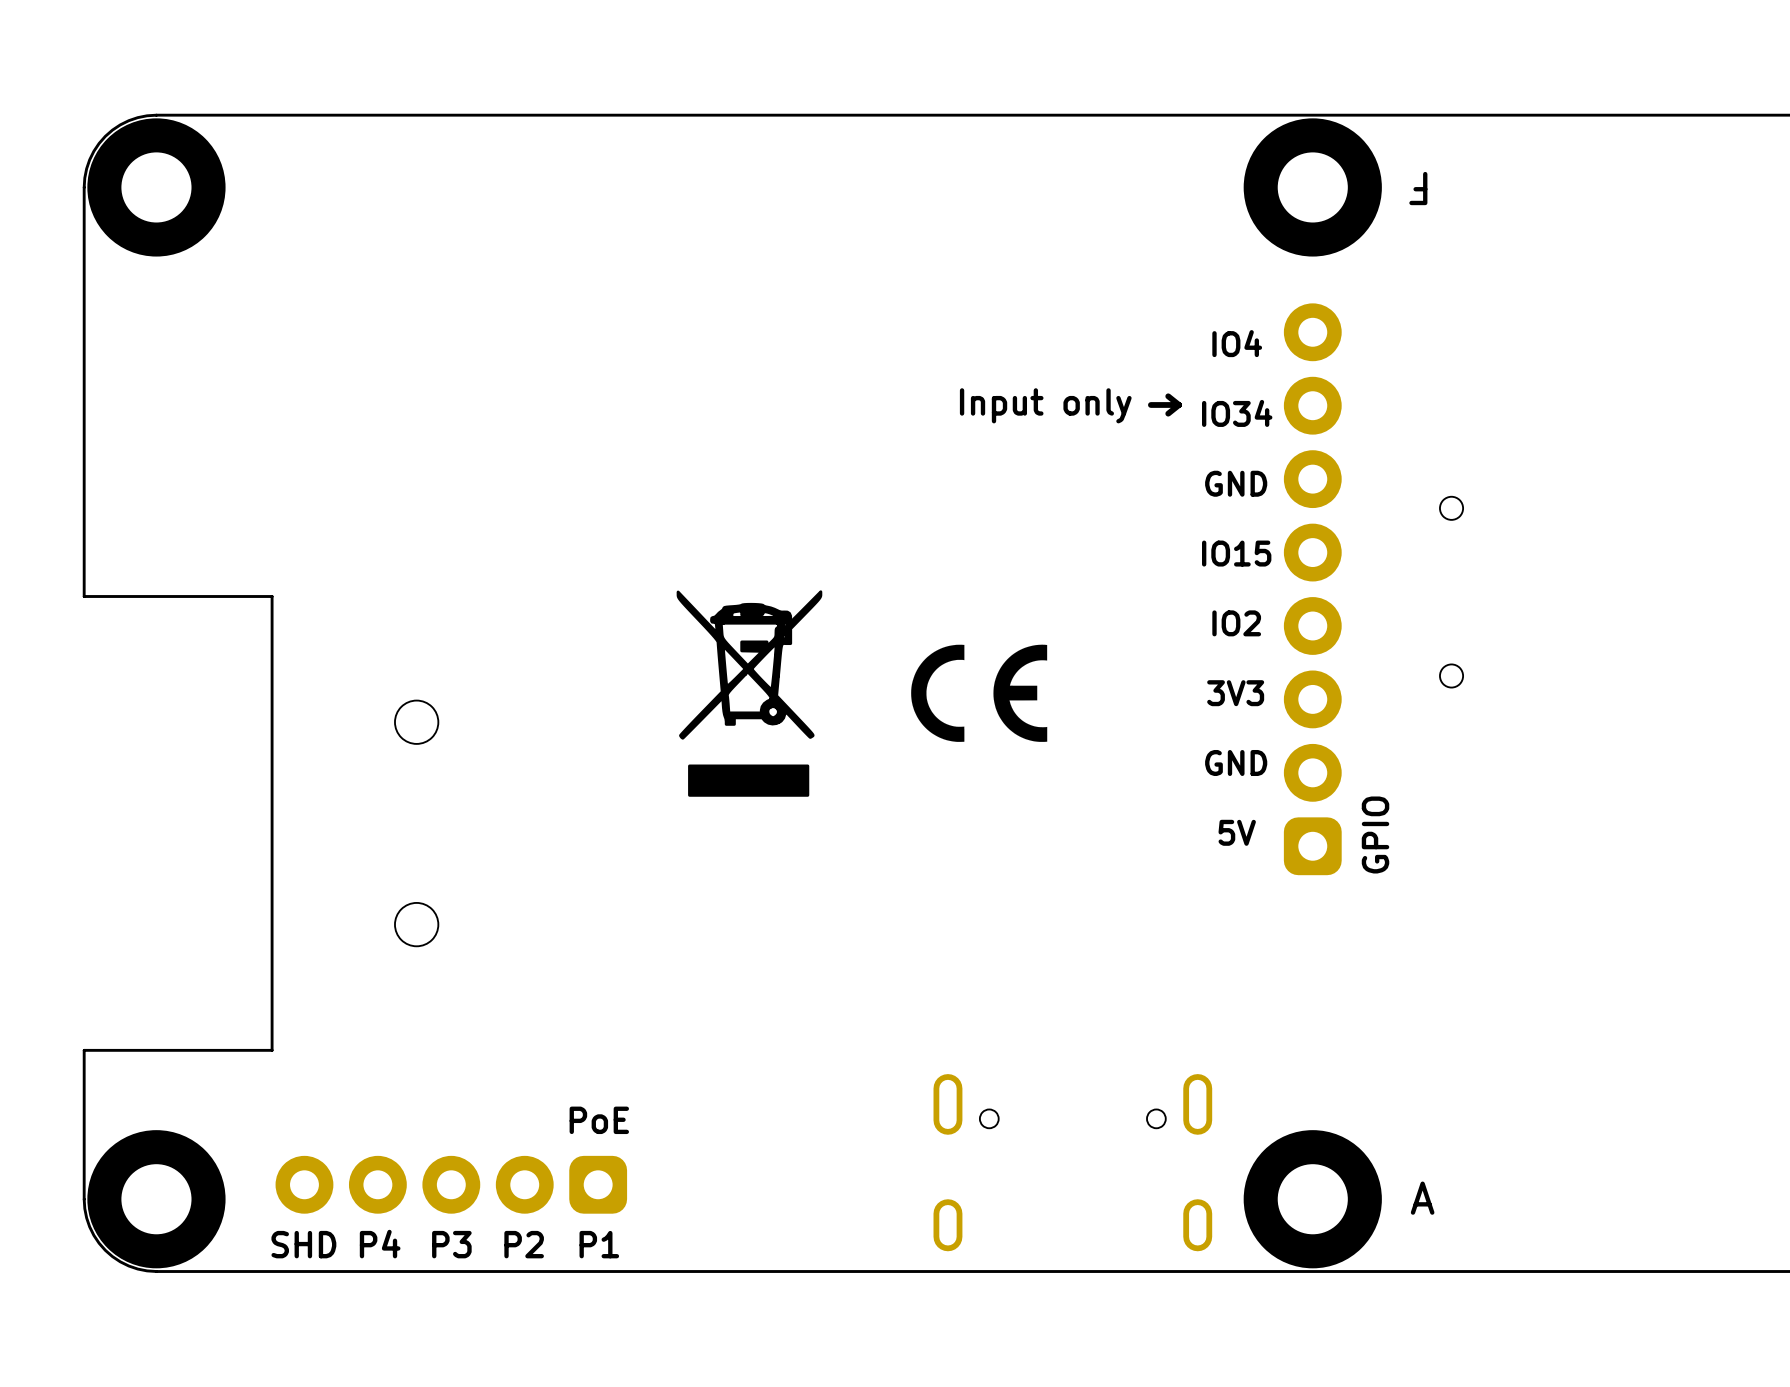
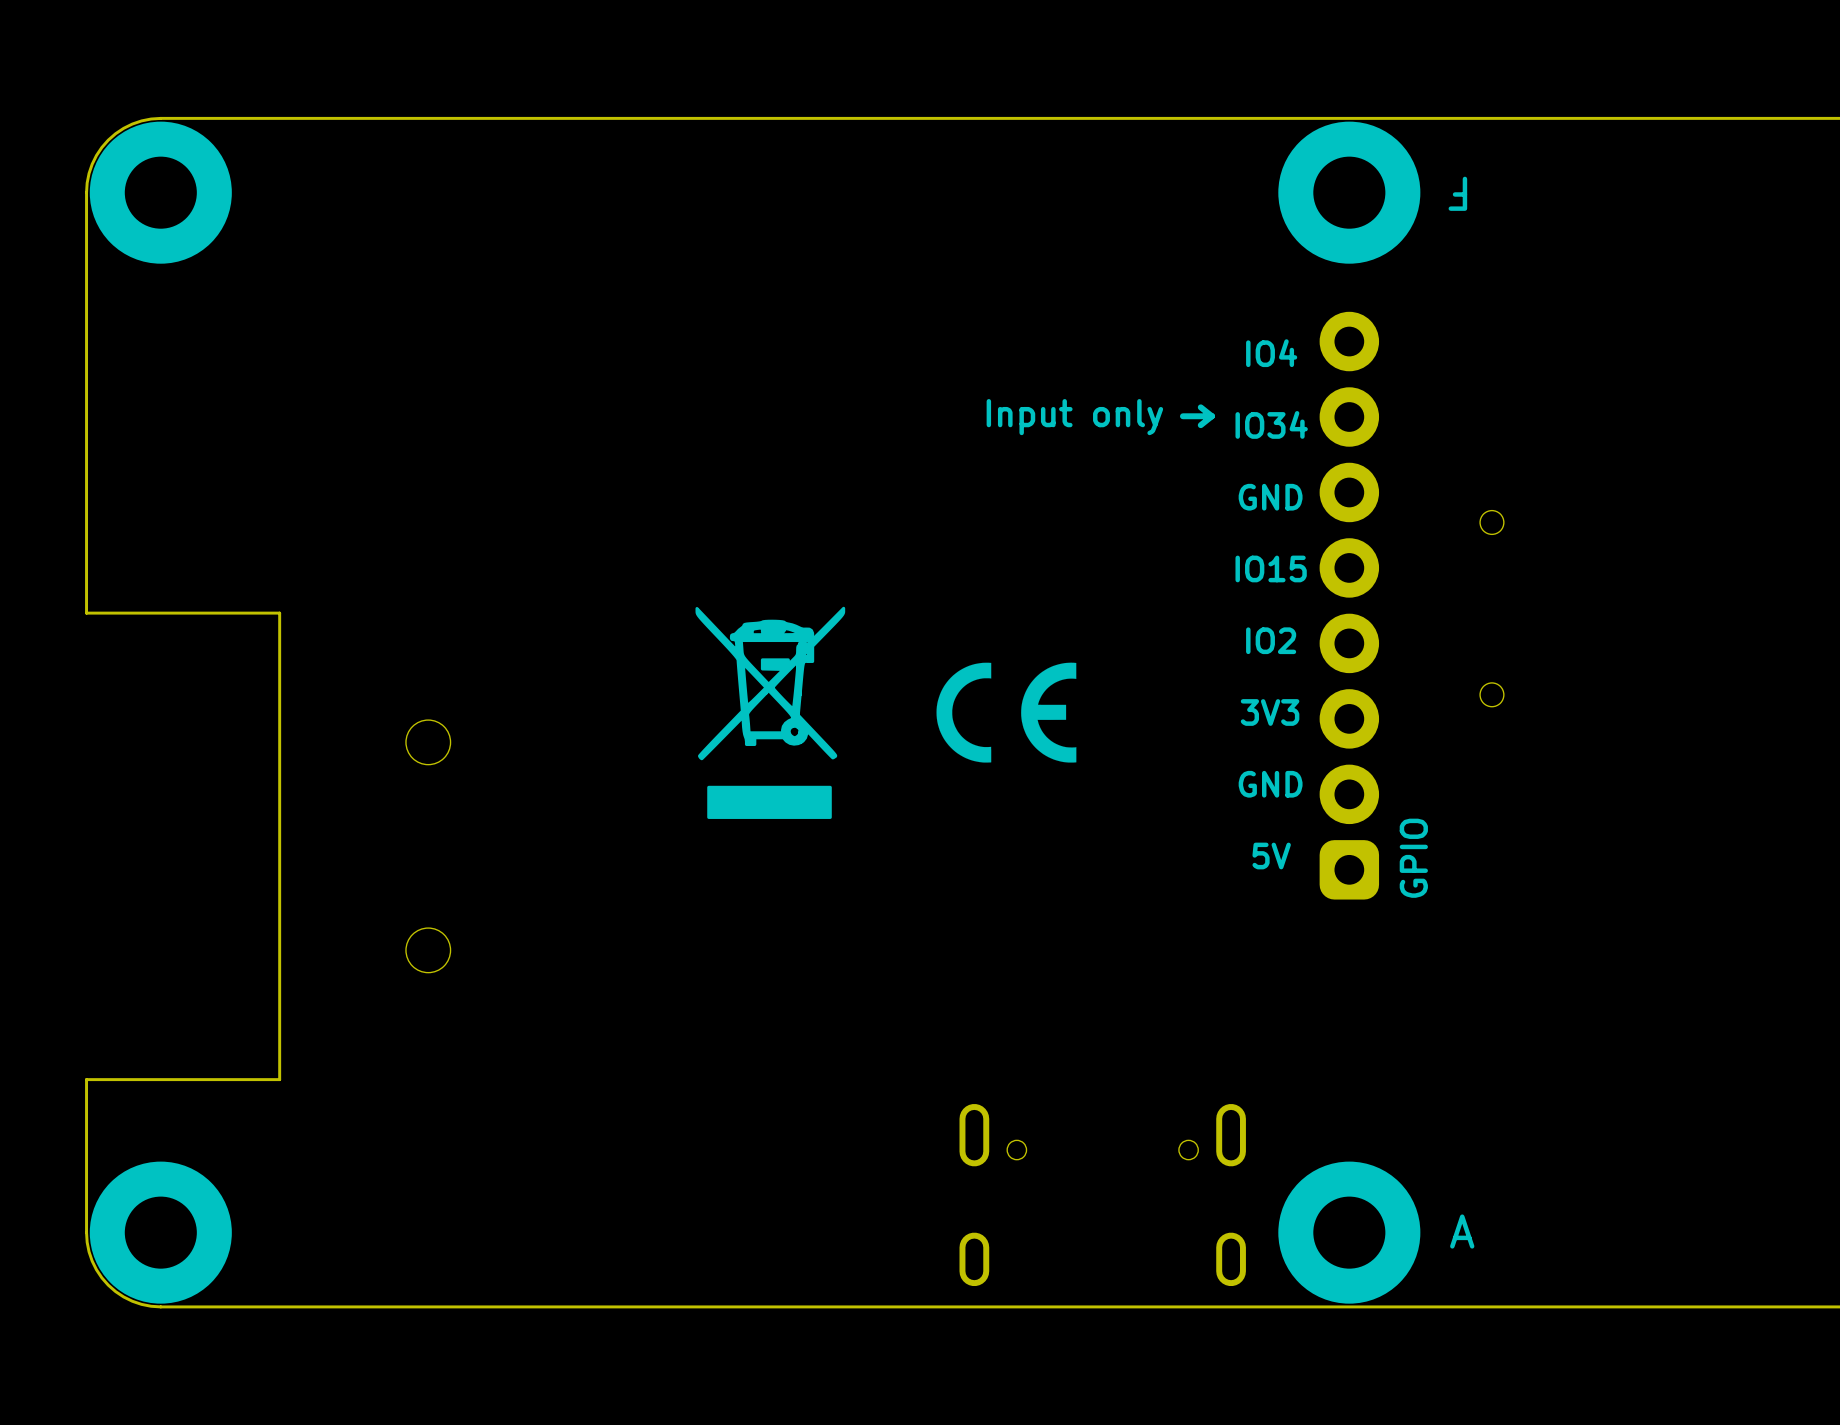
text: PoE (599, 1120) -> none
part: (451, 1184) -> none
text: SHD (303, 1244) -> none
text: P4 (380, 1244) -> none
text: P3 (451, 1244) -> none
text: P2 (524, 1244) -> none
text: P1 (599, 1244) -> none

